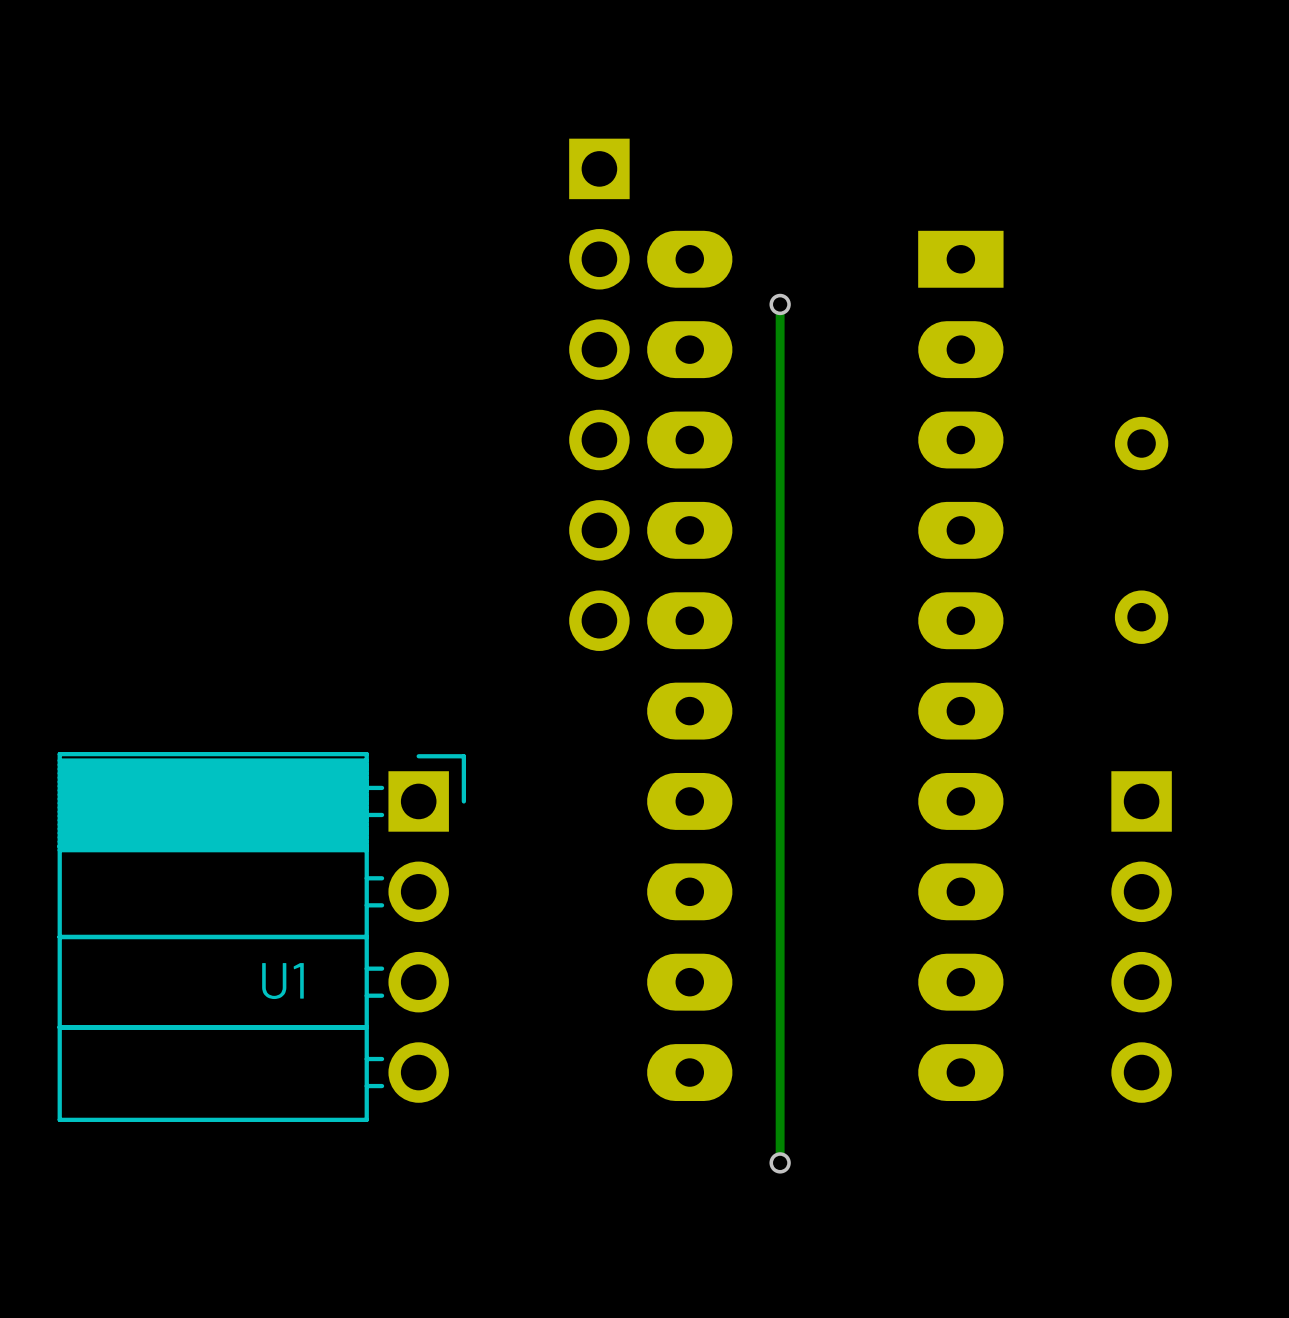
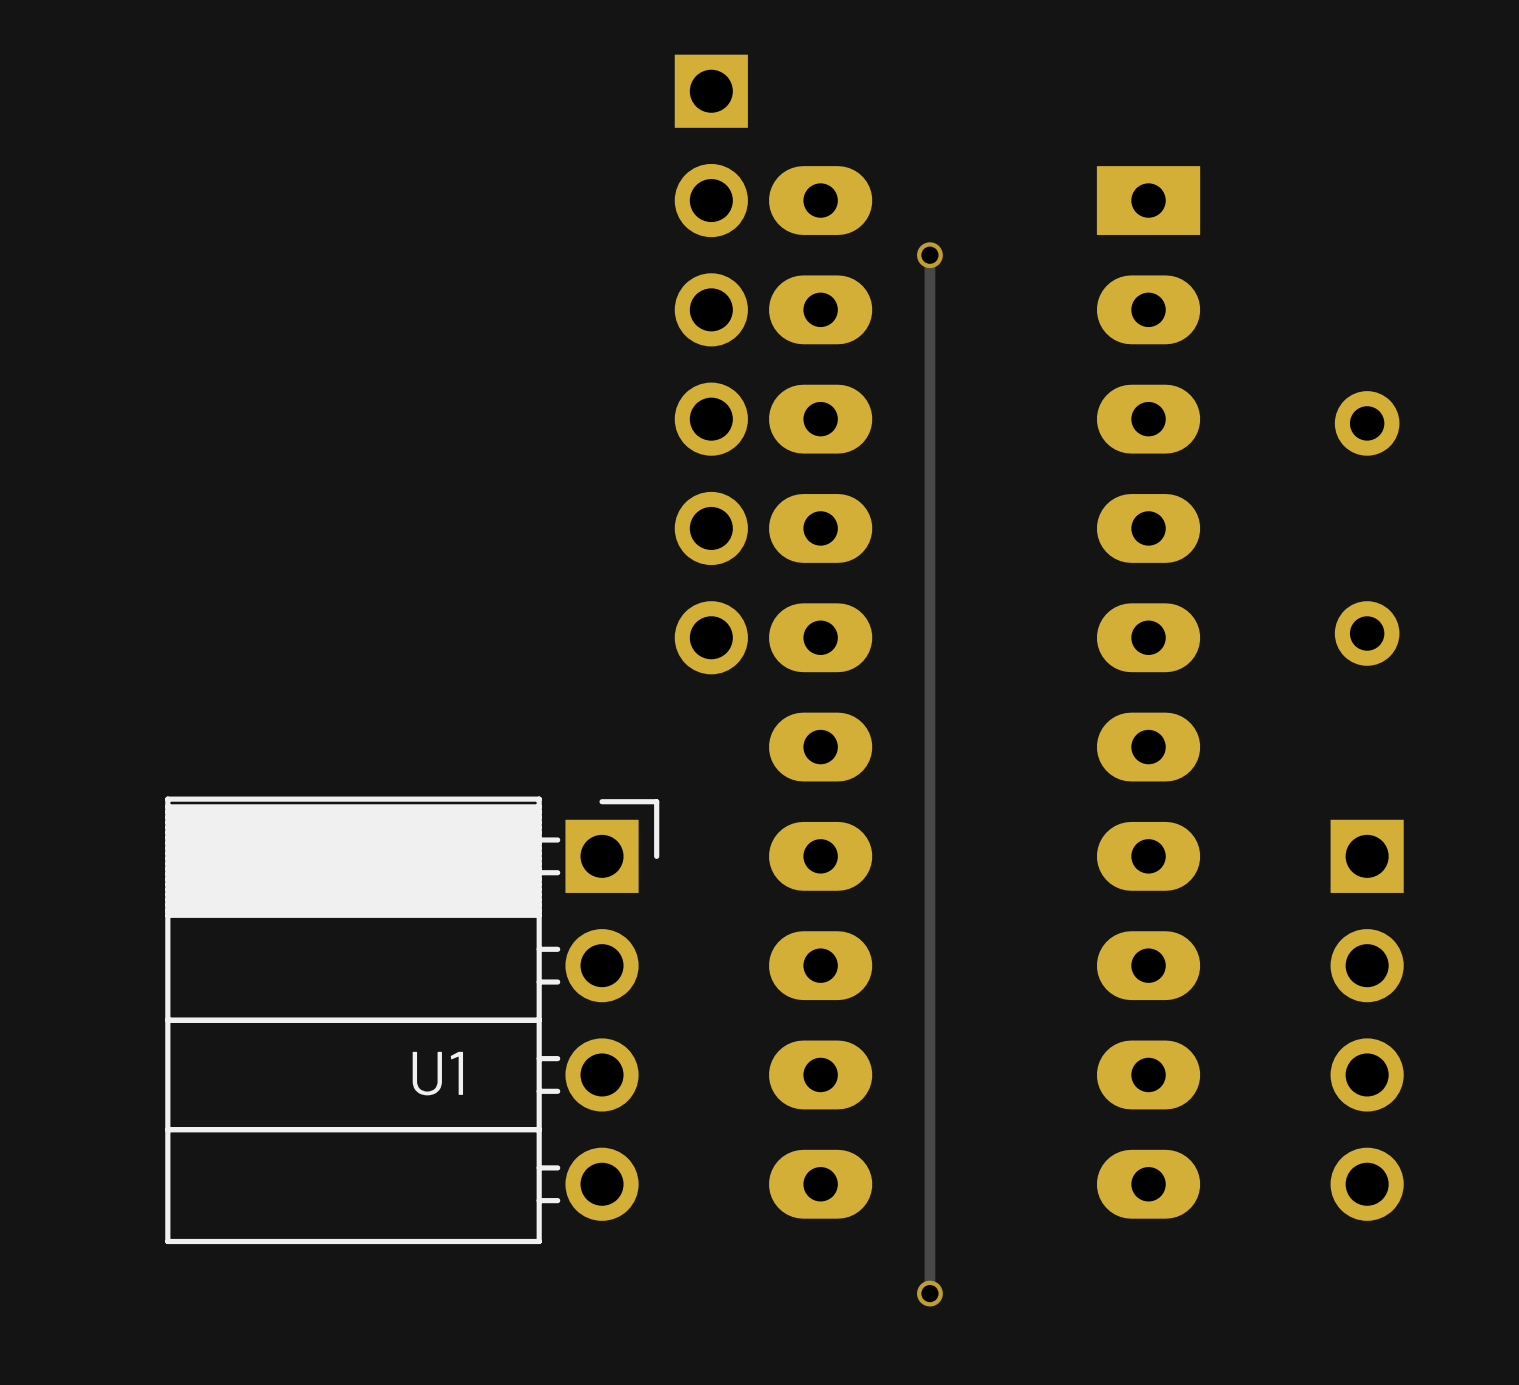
U1 position: (261, 936) -> (412, 1020)

